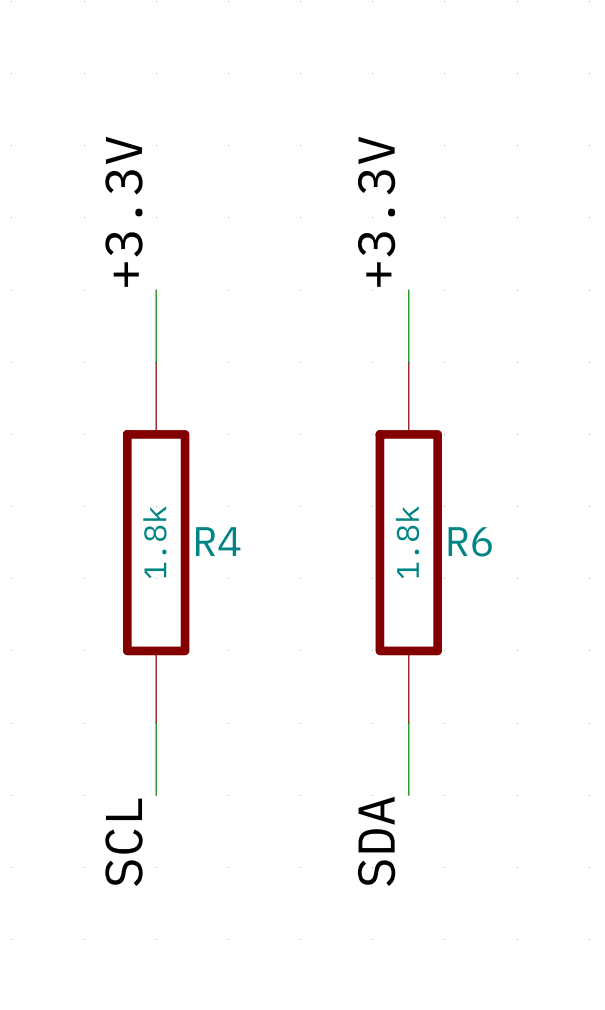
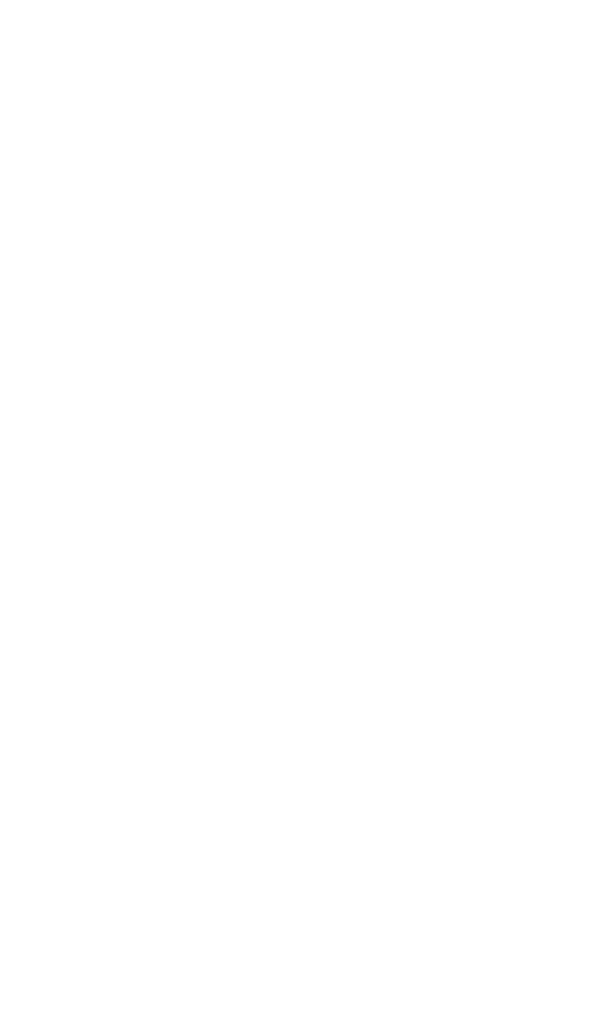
label: +3.3V (123, 211) -> none
label: +3.3V (376, 211) -> none
wire: (156, 290) (156, 362) -> none
wire: (408, 290) (408, 362) -> none
R4: 1.8k (156, 542) -> none
R6: 1.8k (408, 542) -> none
wire: (156, 723) (156, 795) -> none
wire: (408, 723) (408, 795) -> none
label: SDA (376, 841) -> none
label: SCL (123, 842) -> none

